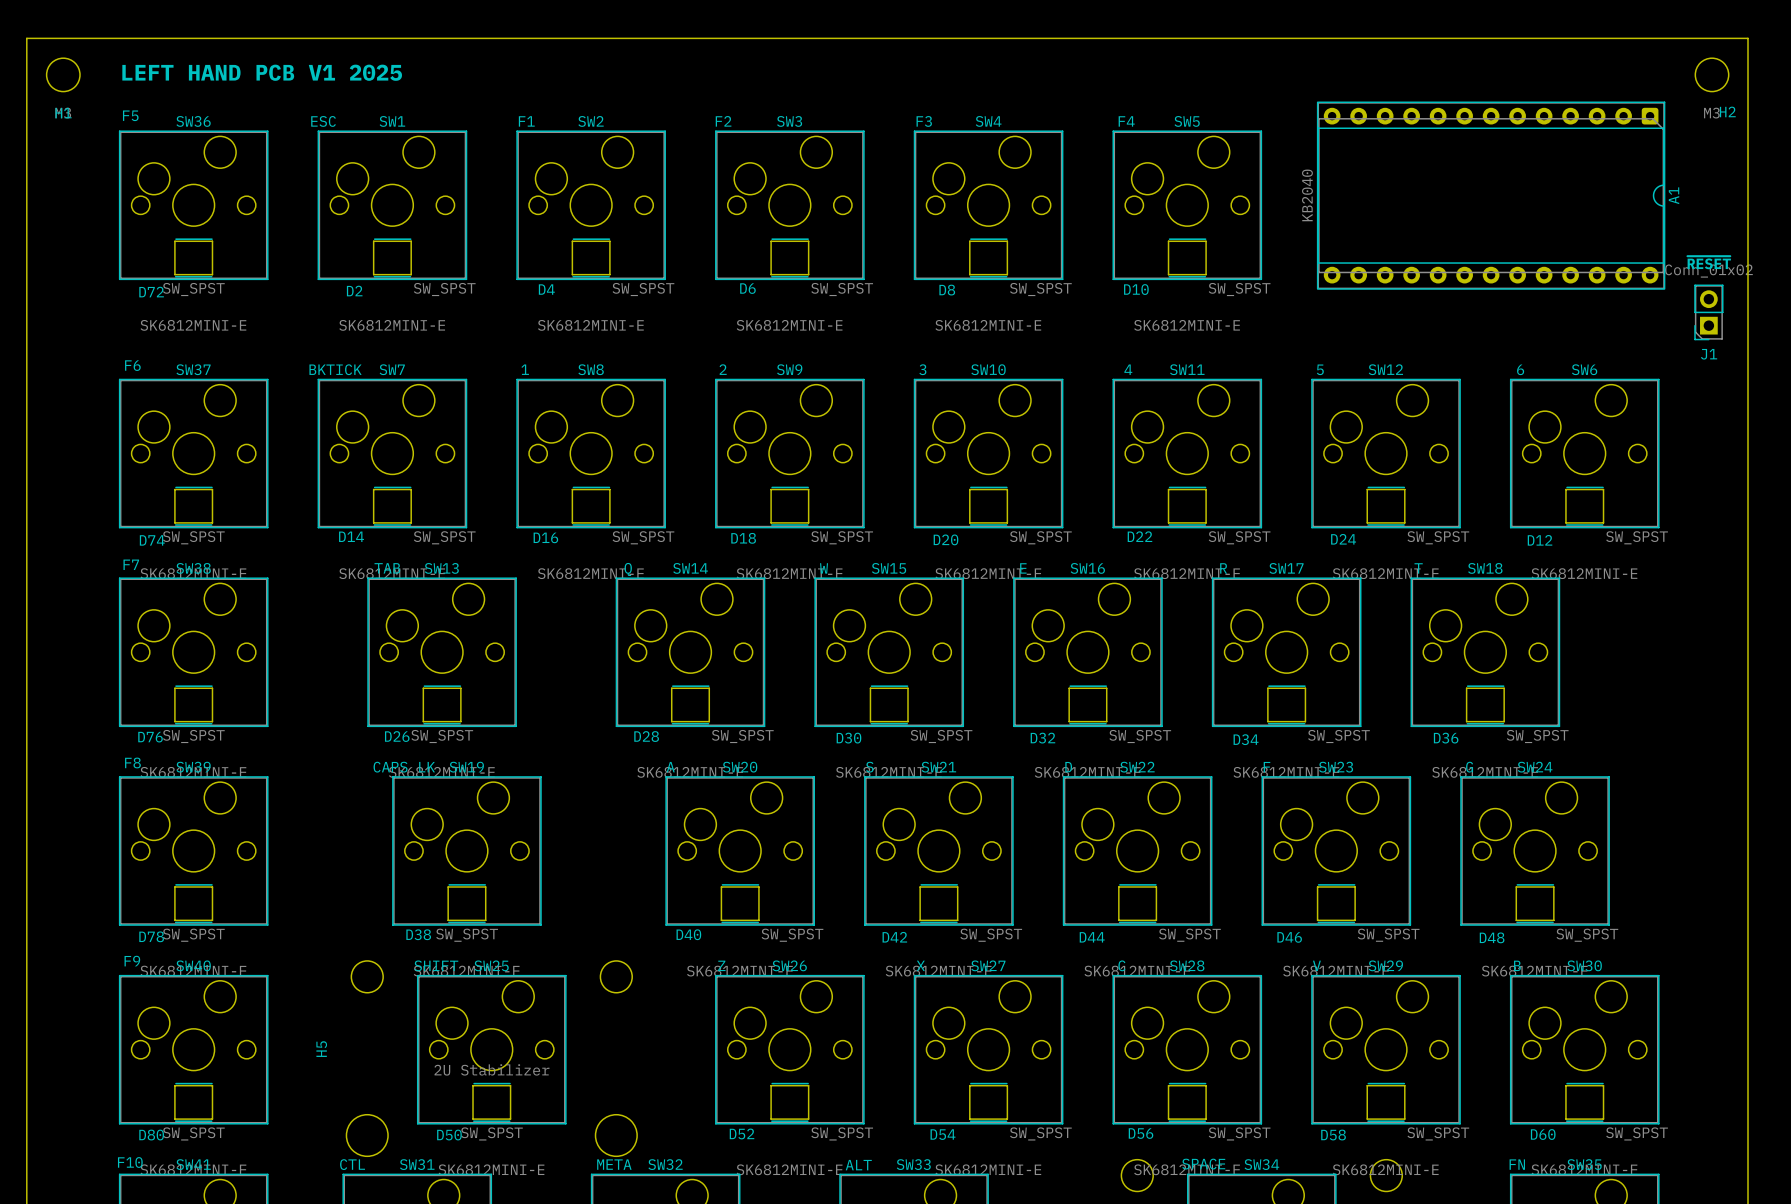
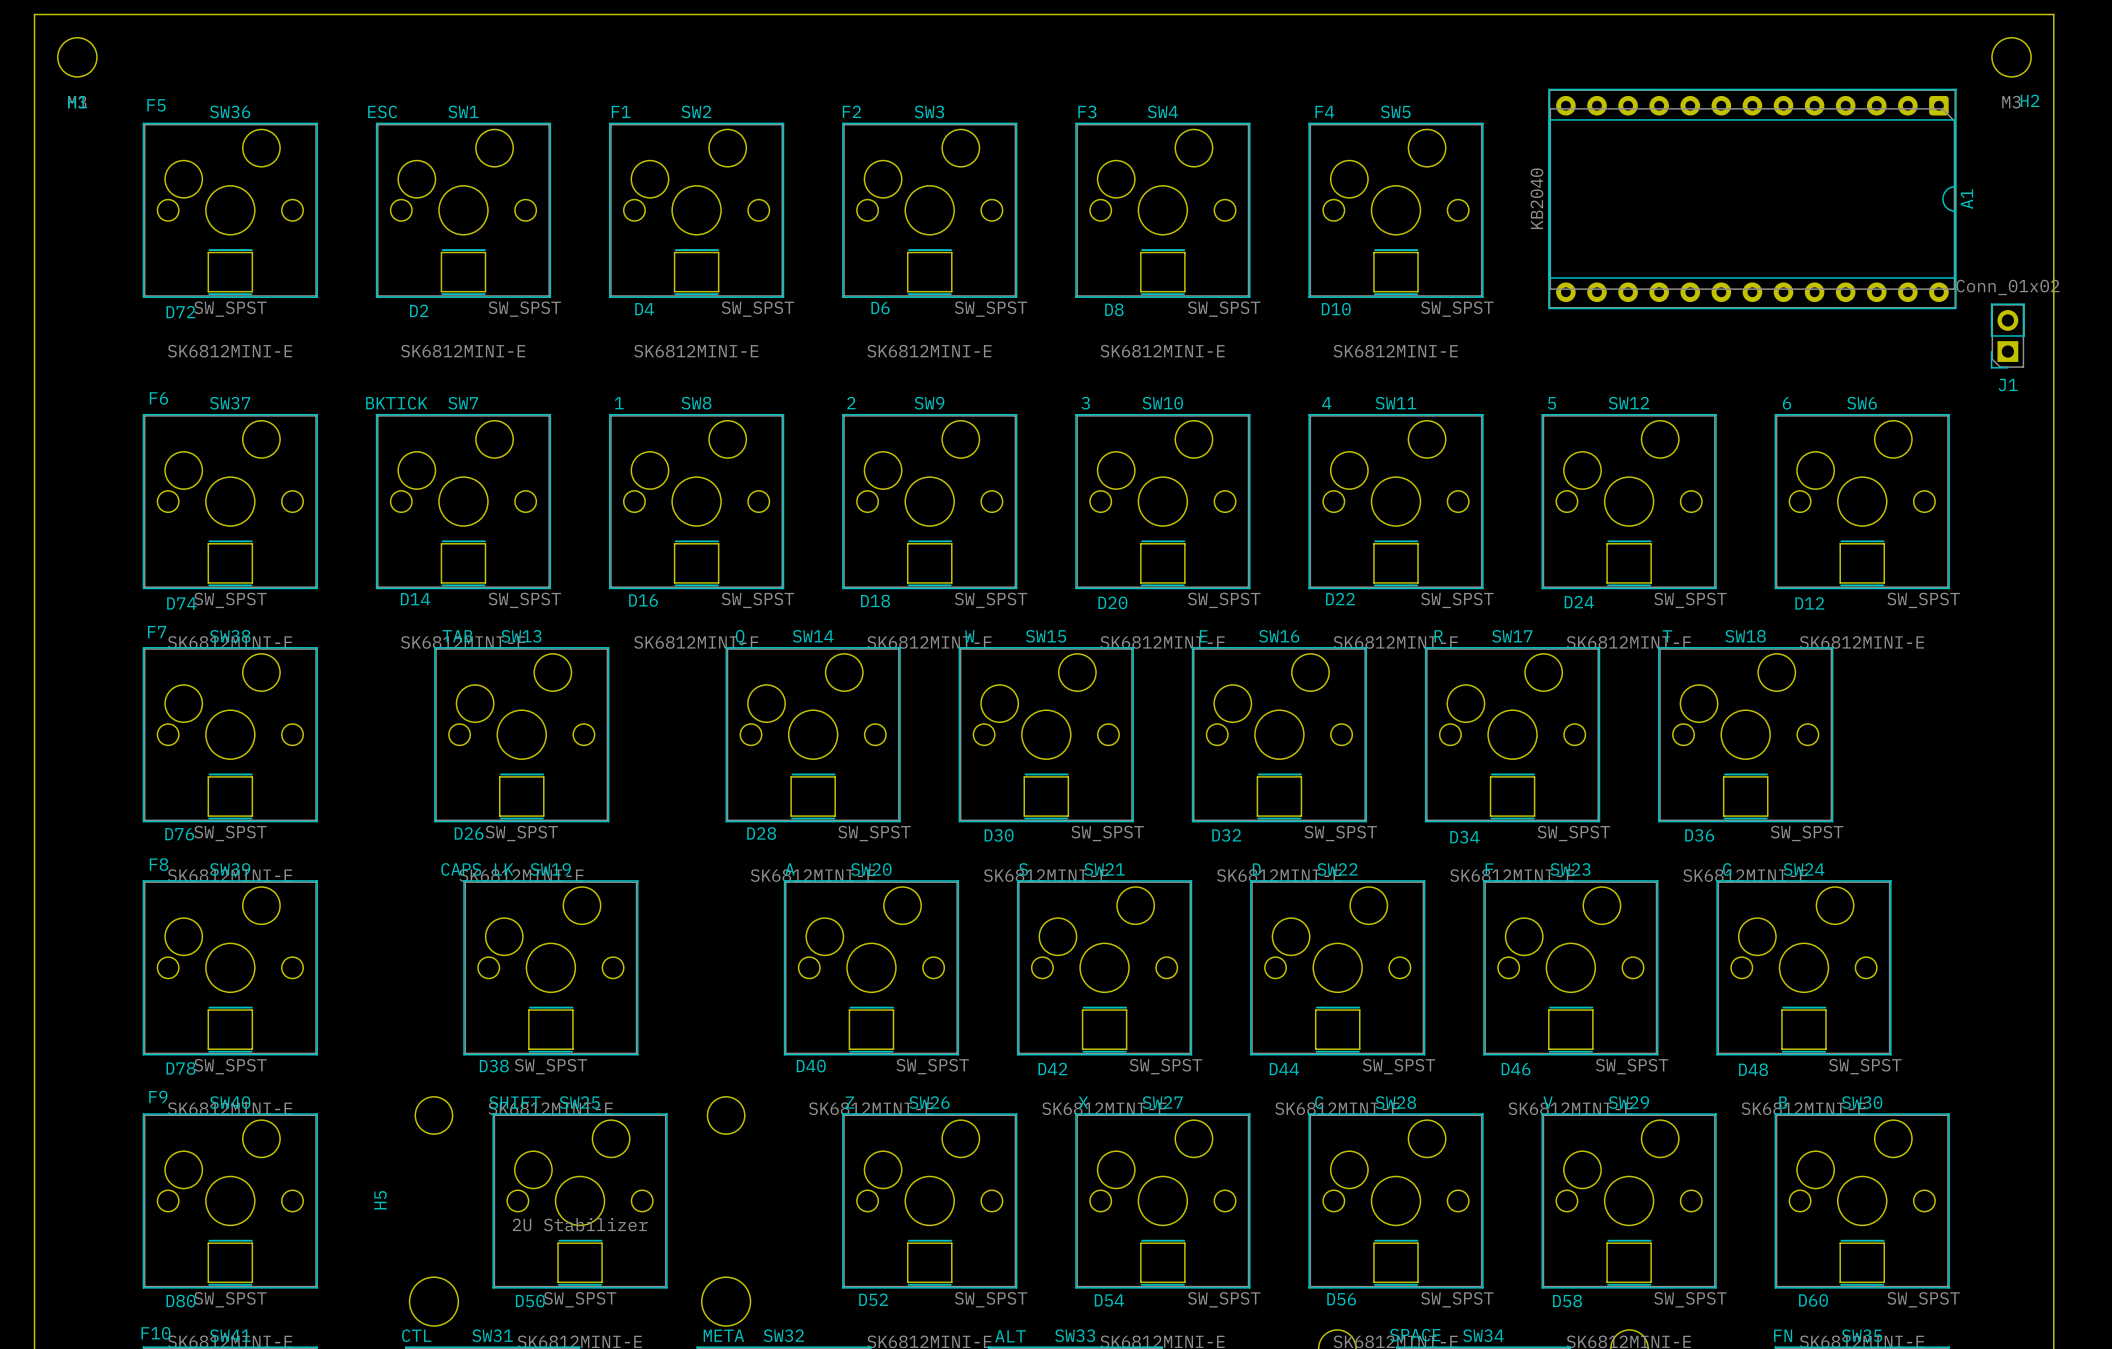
text: LEFT HAND PCB V1 2025 (262, 72) -> none
text: ~{RESET} (1709, 262) -> none

